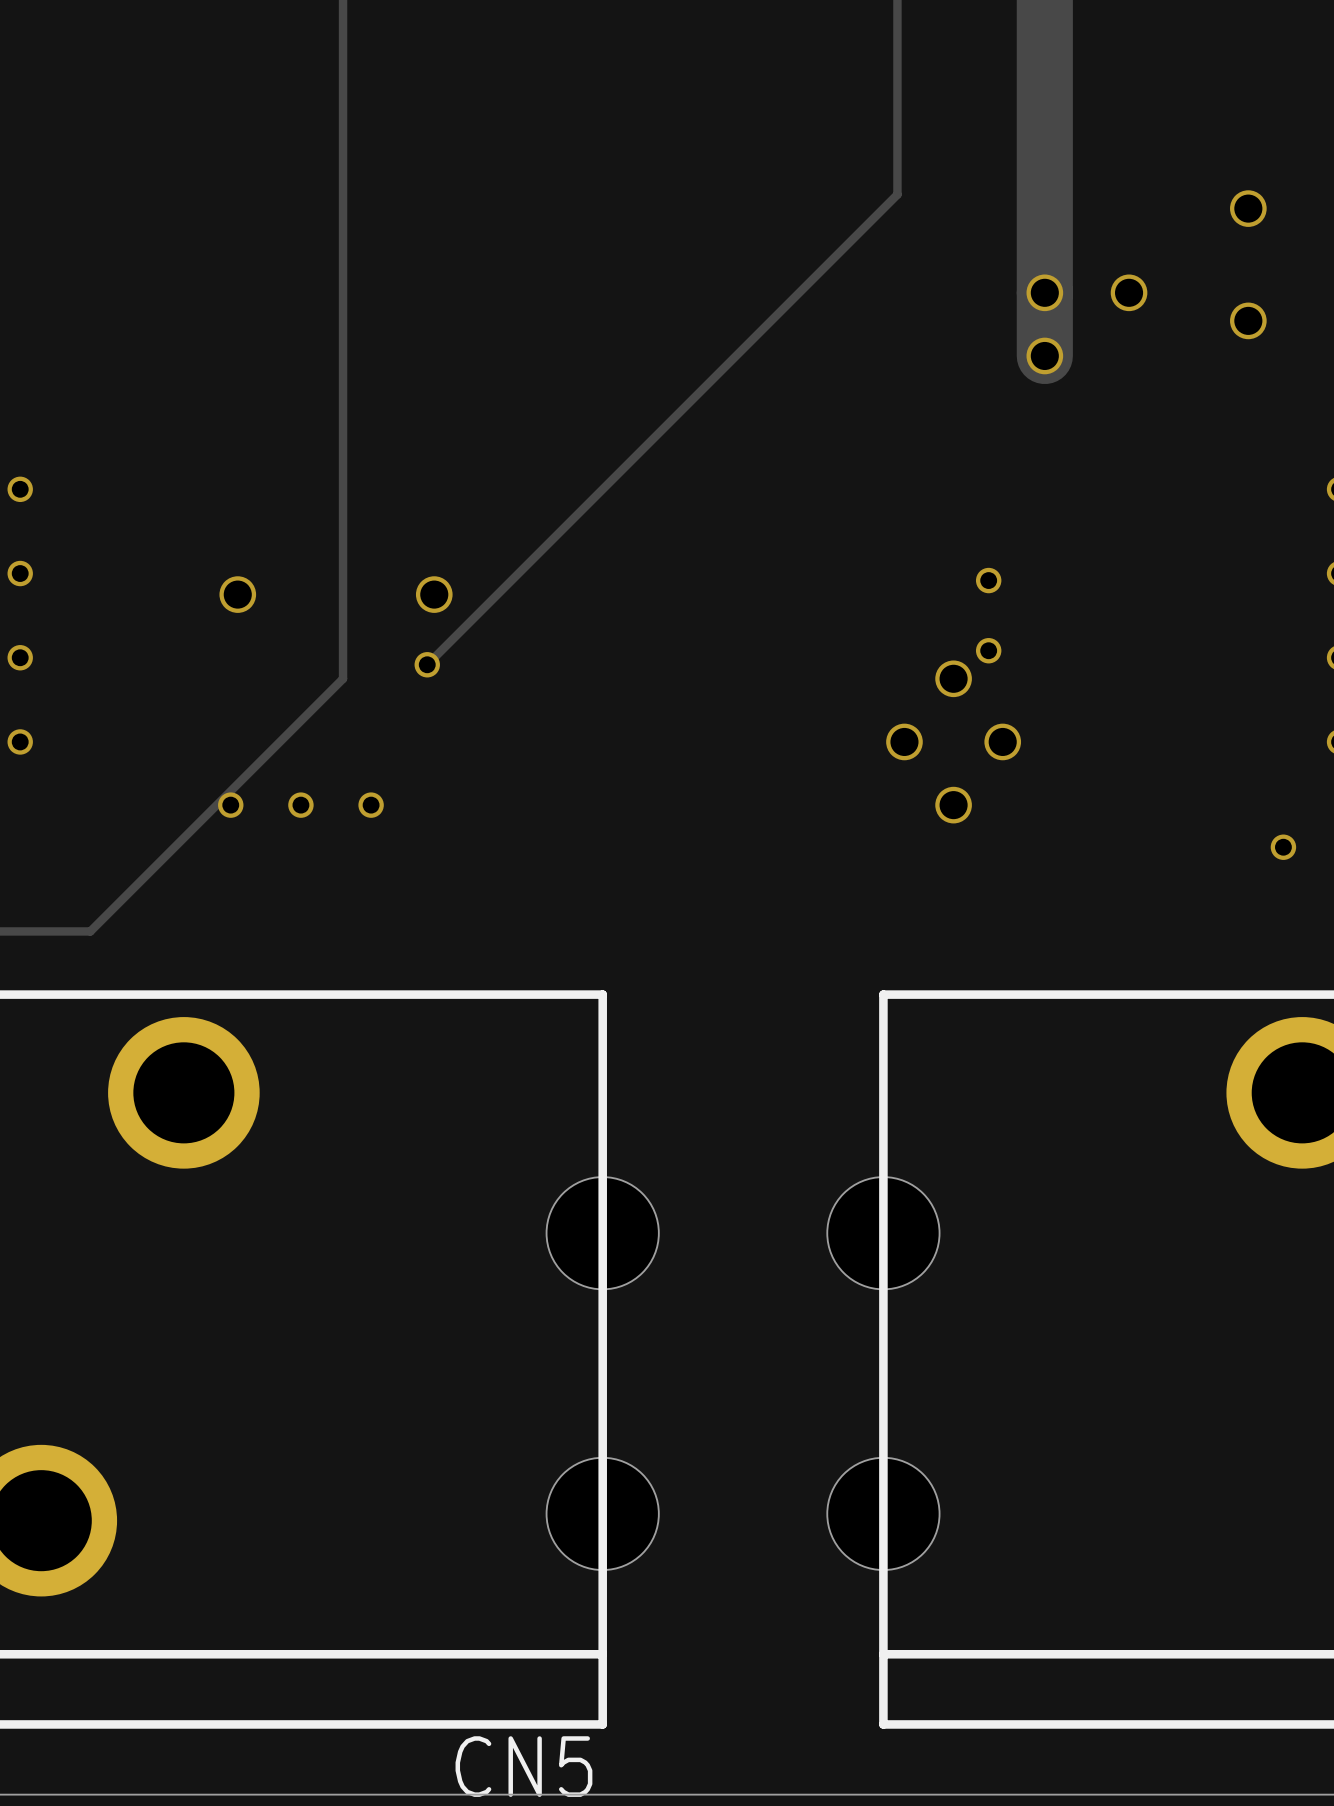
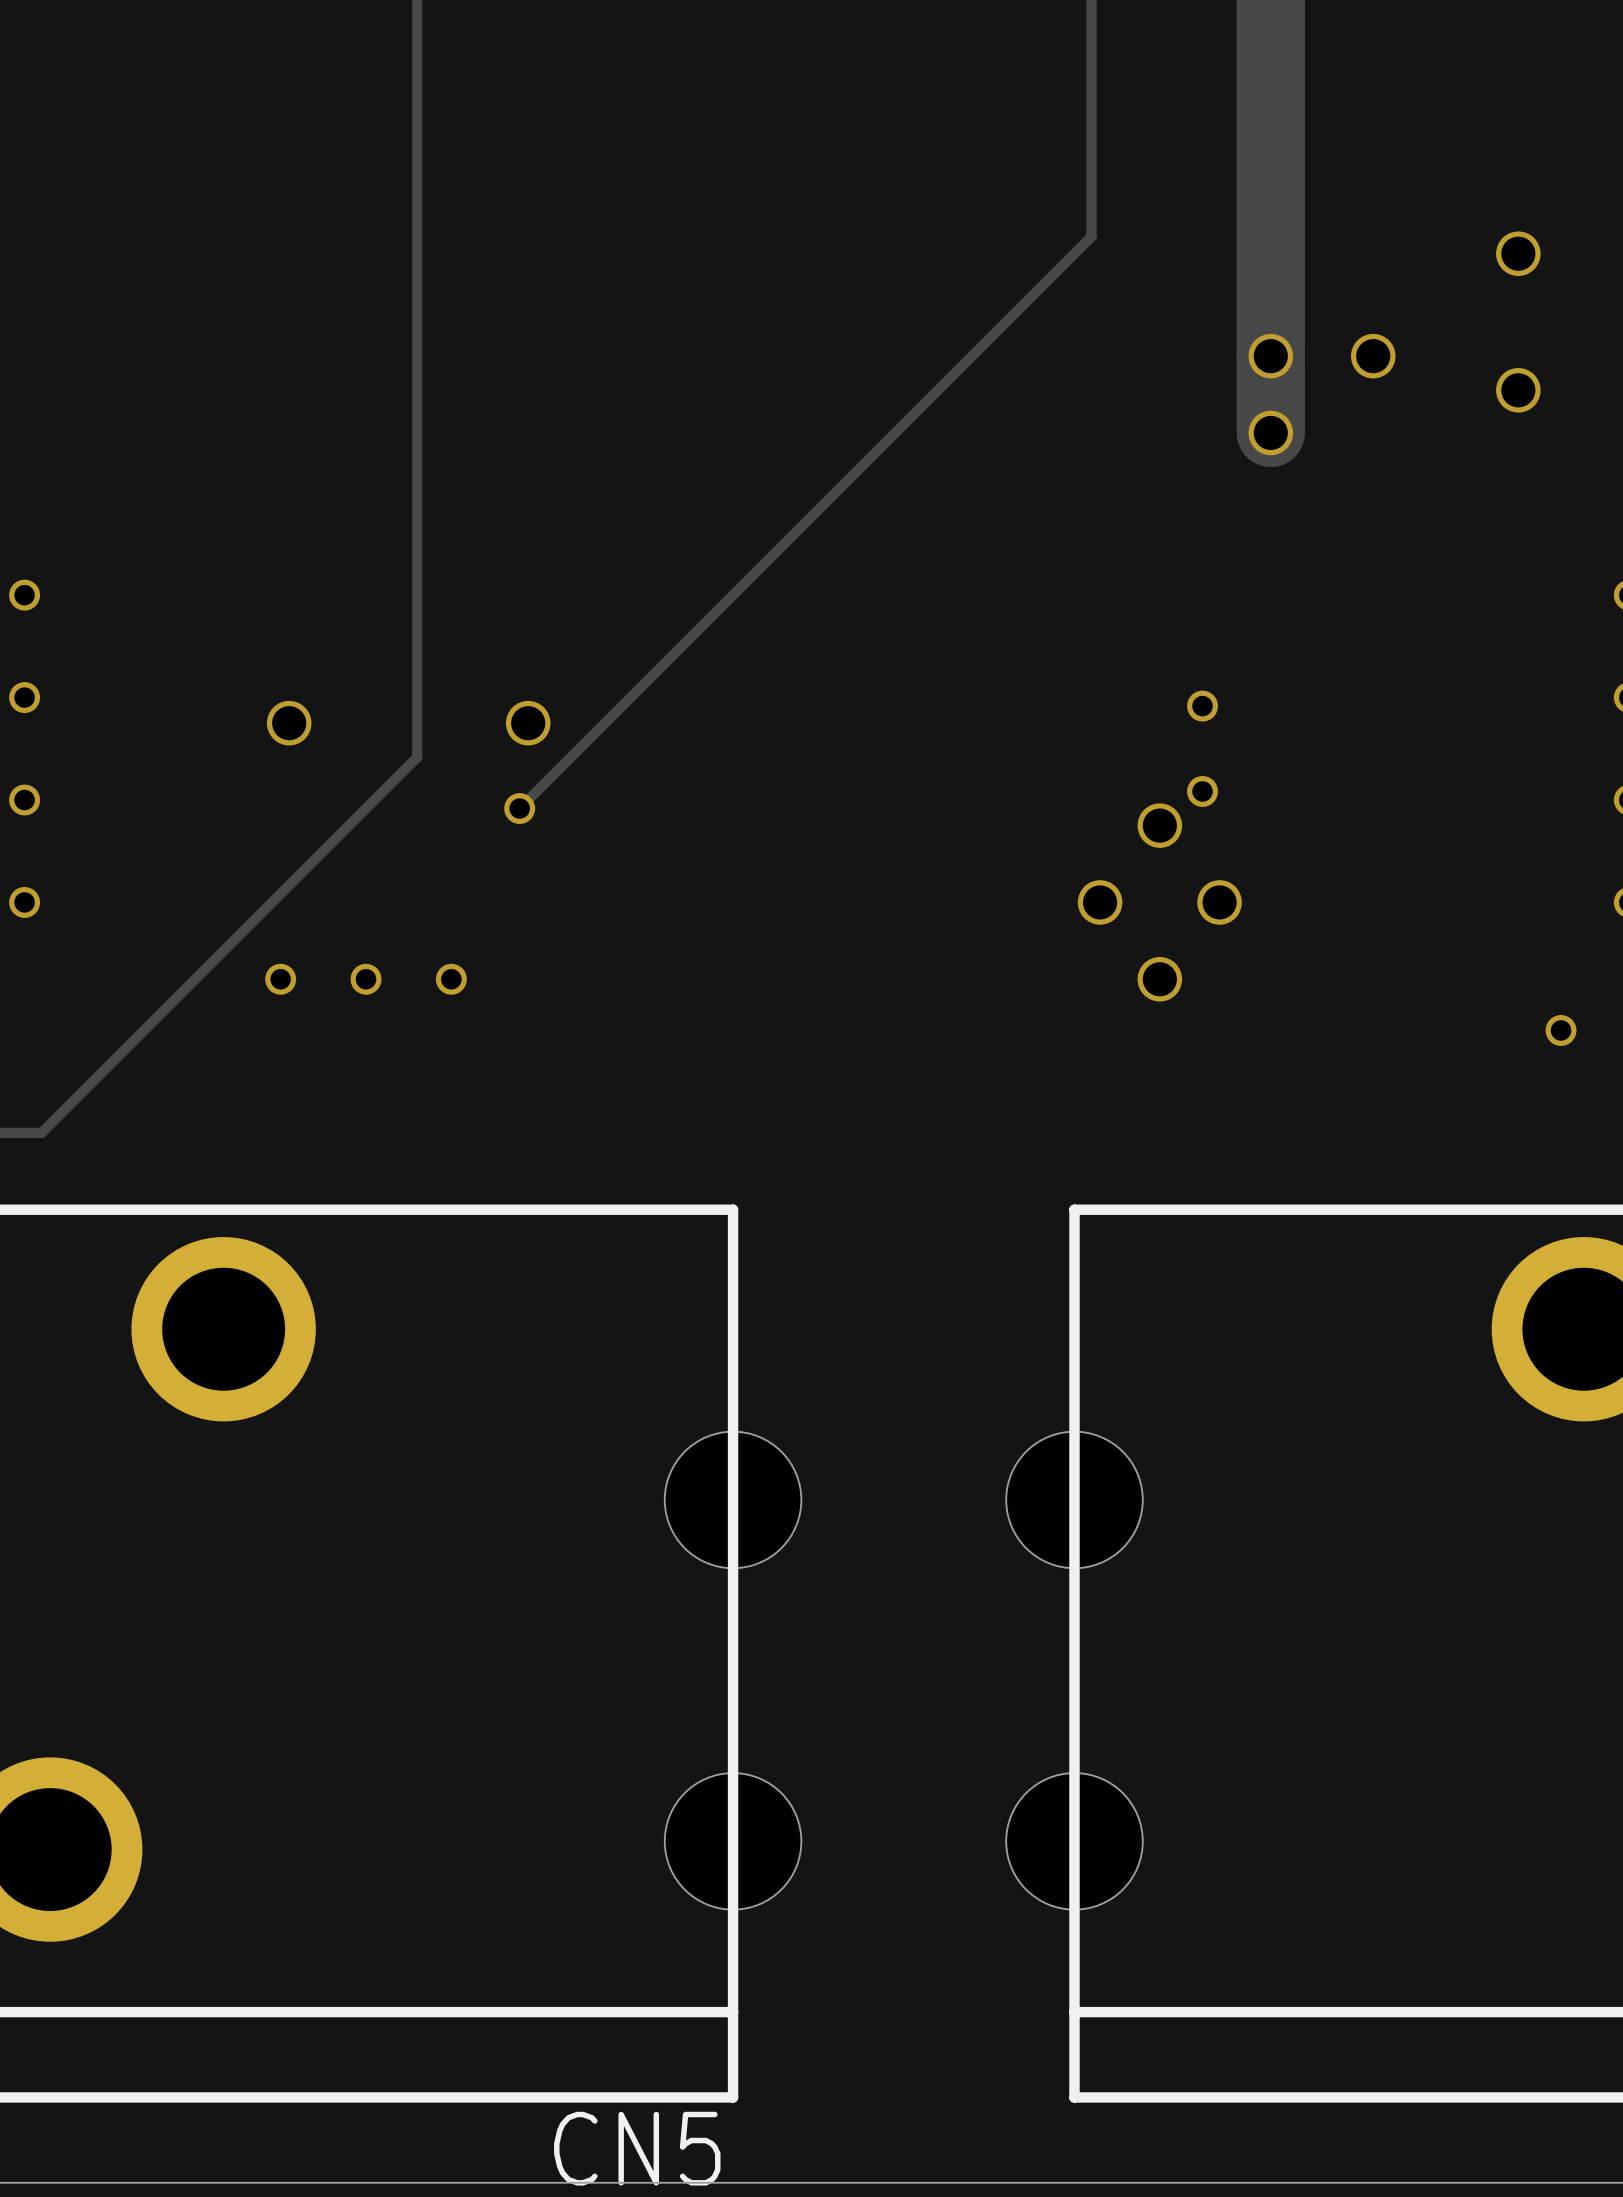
track: (343, 622) (343, 678) (90, 931) (34, 931) -> (417, 757) (41, 1132)

